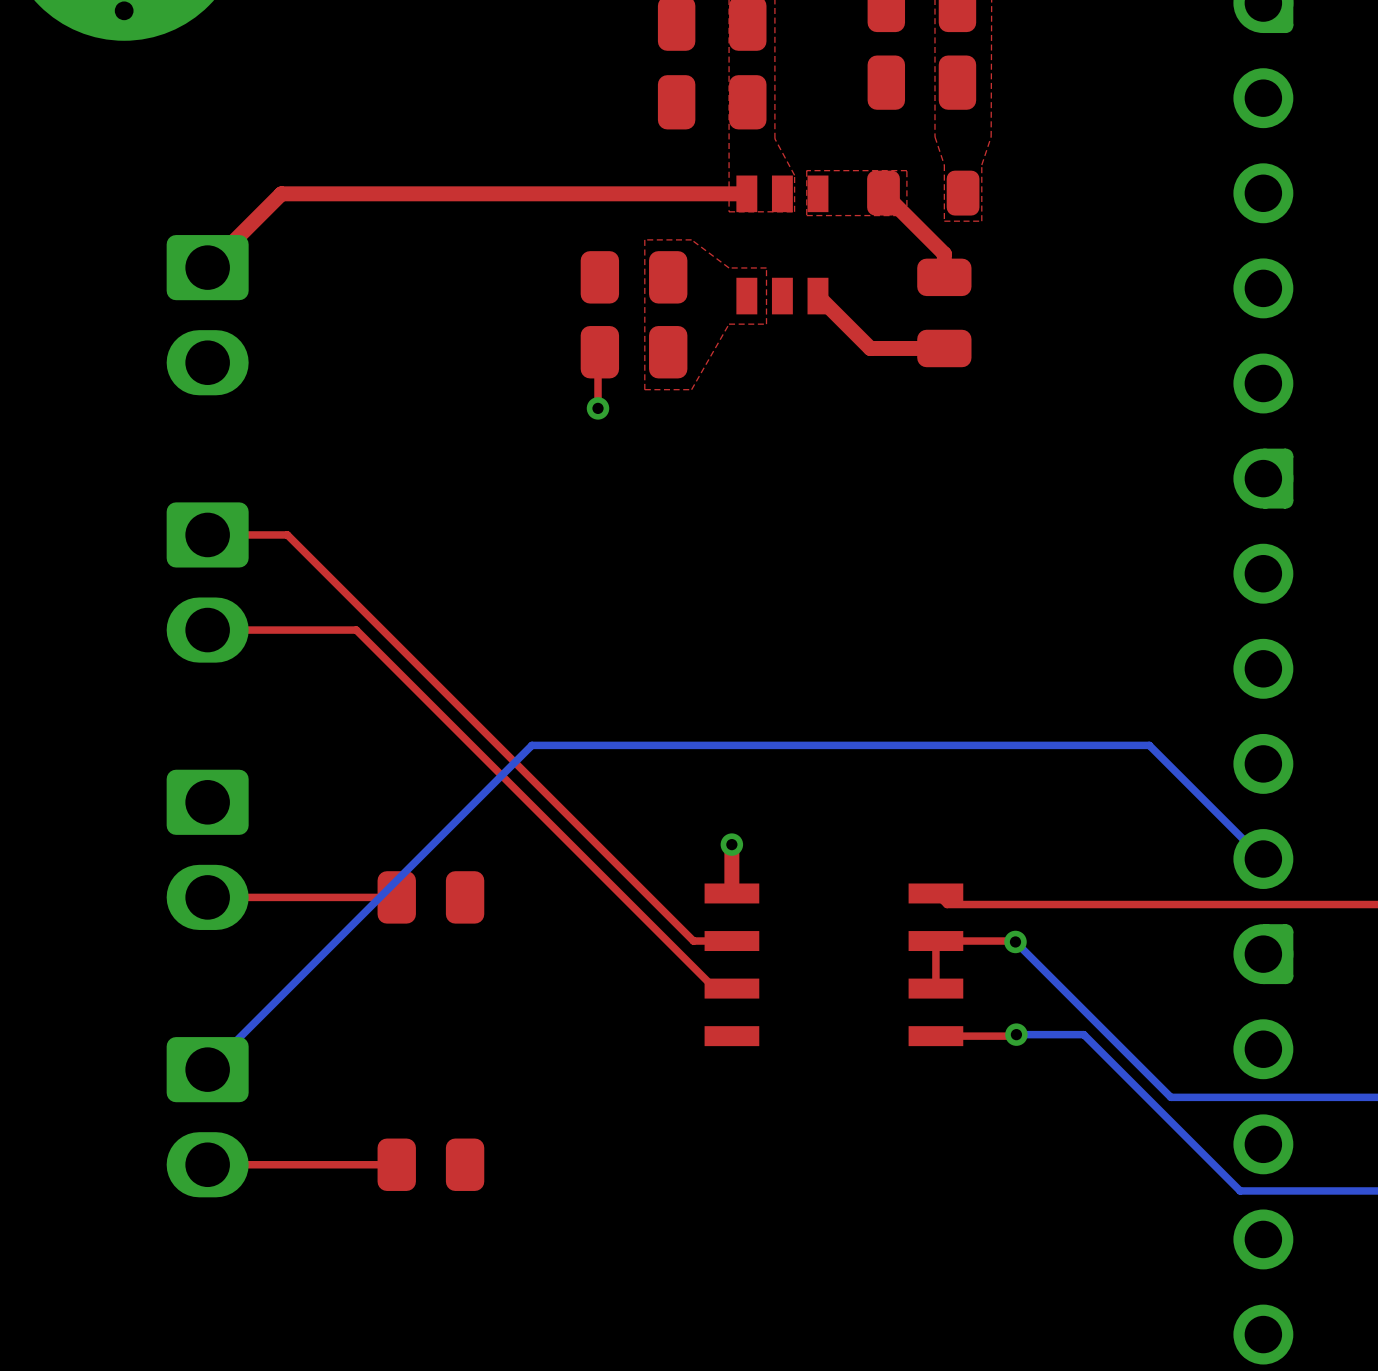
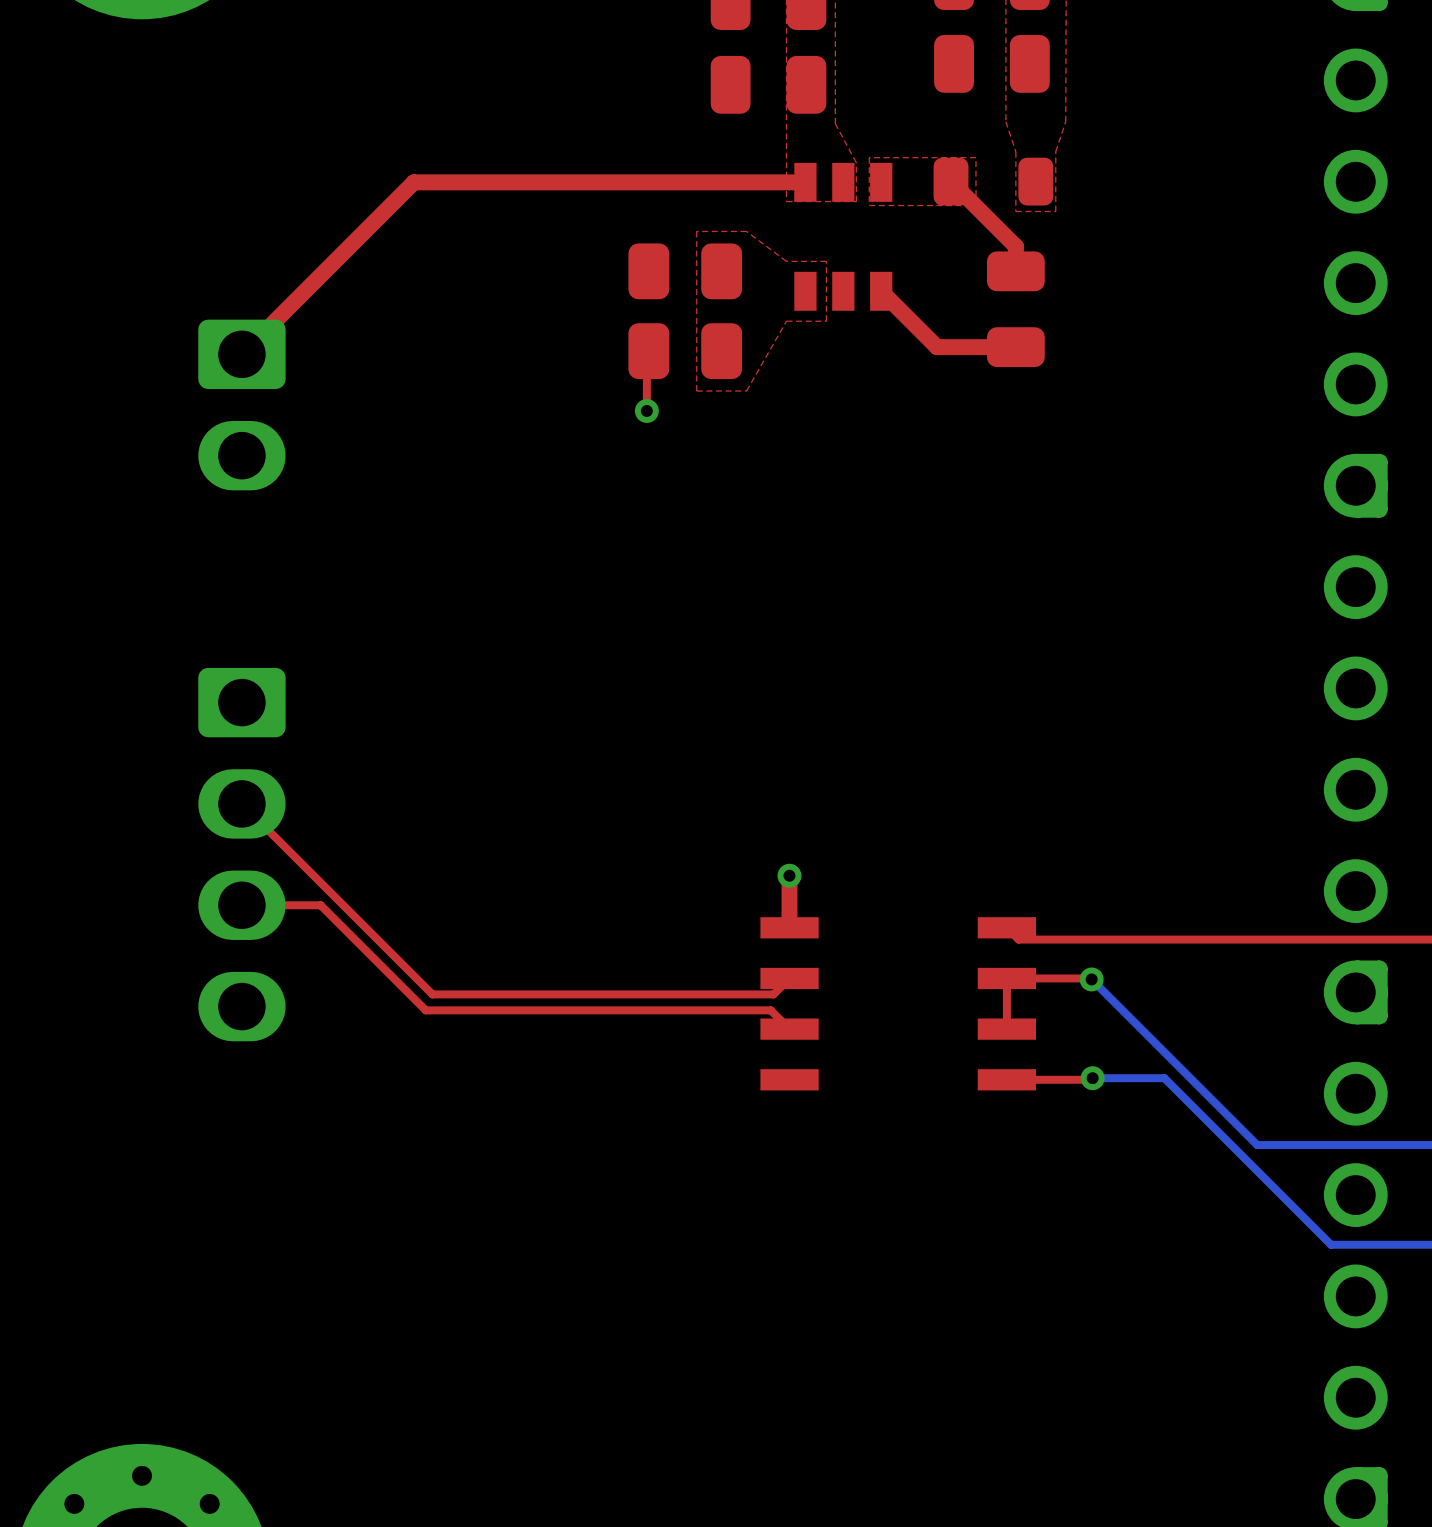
top track: (379, 193) (281, 193) (207, 267) -> (413, 182) (241, 354)
part position: (207, 315) -> (241, 404)
top track: (207, 534) (287, 534) (693, 941) (731, 941) -> (241, 803) (432, 994) (773, 994) (789, 978)
part: (207, 582) -> none
top track: (207, 630) (356, 630) (714, 988) (731, 988) -> (241, 905) (320, 905) (425, 1010) (770, 1010) (789, 1029)
part footprint: [166, 769, 249, 930] -> [198, 667, 286, 1042]
bottom track: (1262, 859) (1149, 745) (531, 745) (207, 1069) -> none
top track: (396, 897) (207, 897) (215, 905) -> none
part: (430, 897) -> none
part: (207, 1117) -> none
top track: (396, 1164) (207, 1164) (210, 1167) -> none
part: (430, 1164) -> none

